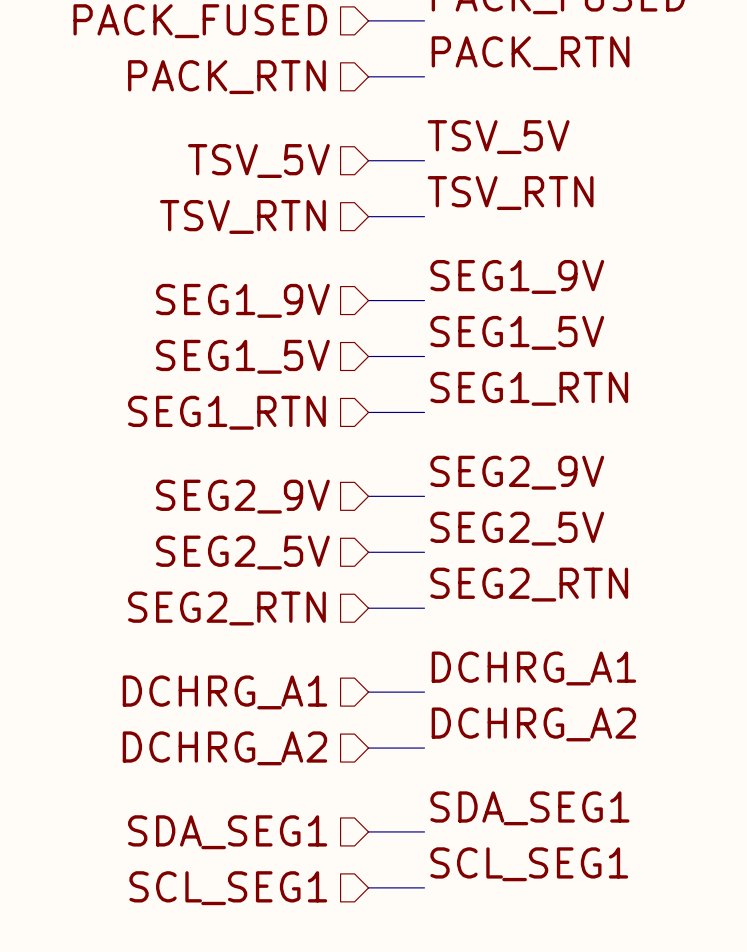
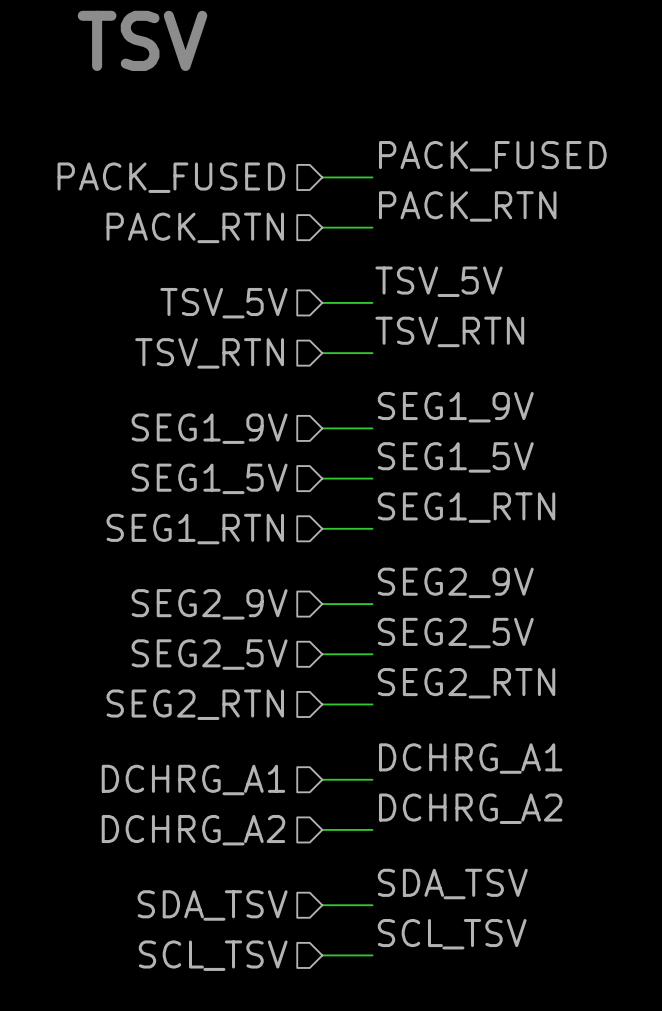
label: SDA_SEG1 (529, 808) -> SDA_TSV (452, 884)
hierarchical label: SDA_SEG1 (227, 832) -> SDA_TSV (212, 905)
label: SCL_SEG1 (529, 864) -> SCL_TSV (452, 934)
hierarchical label: SCL_SEG1 (228, 888) -> SCL_TSV (213, 955)

